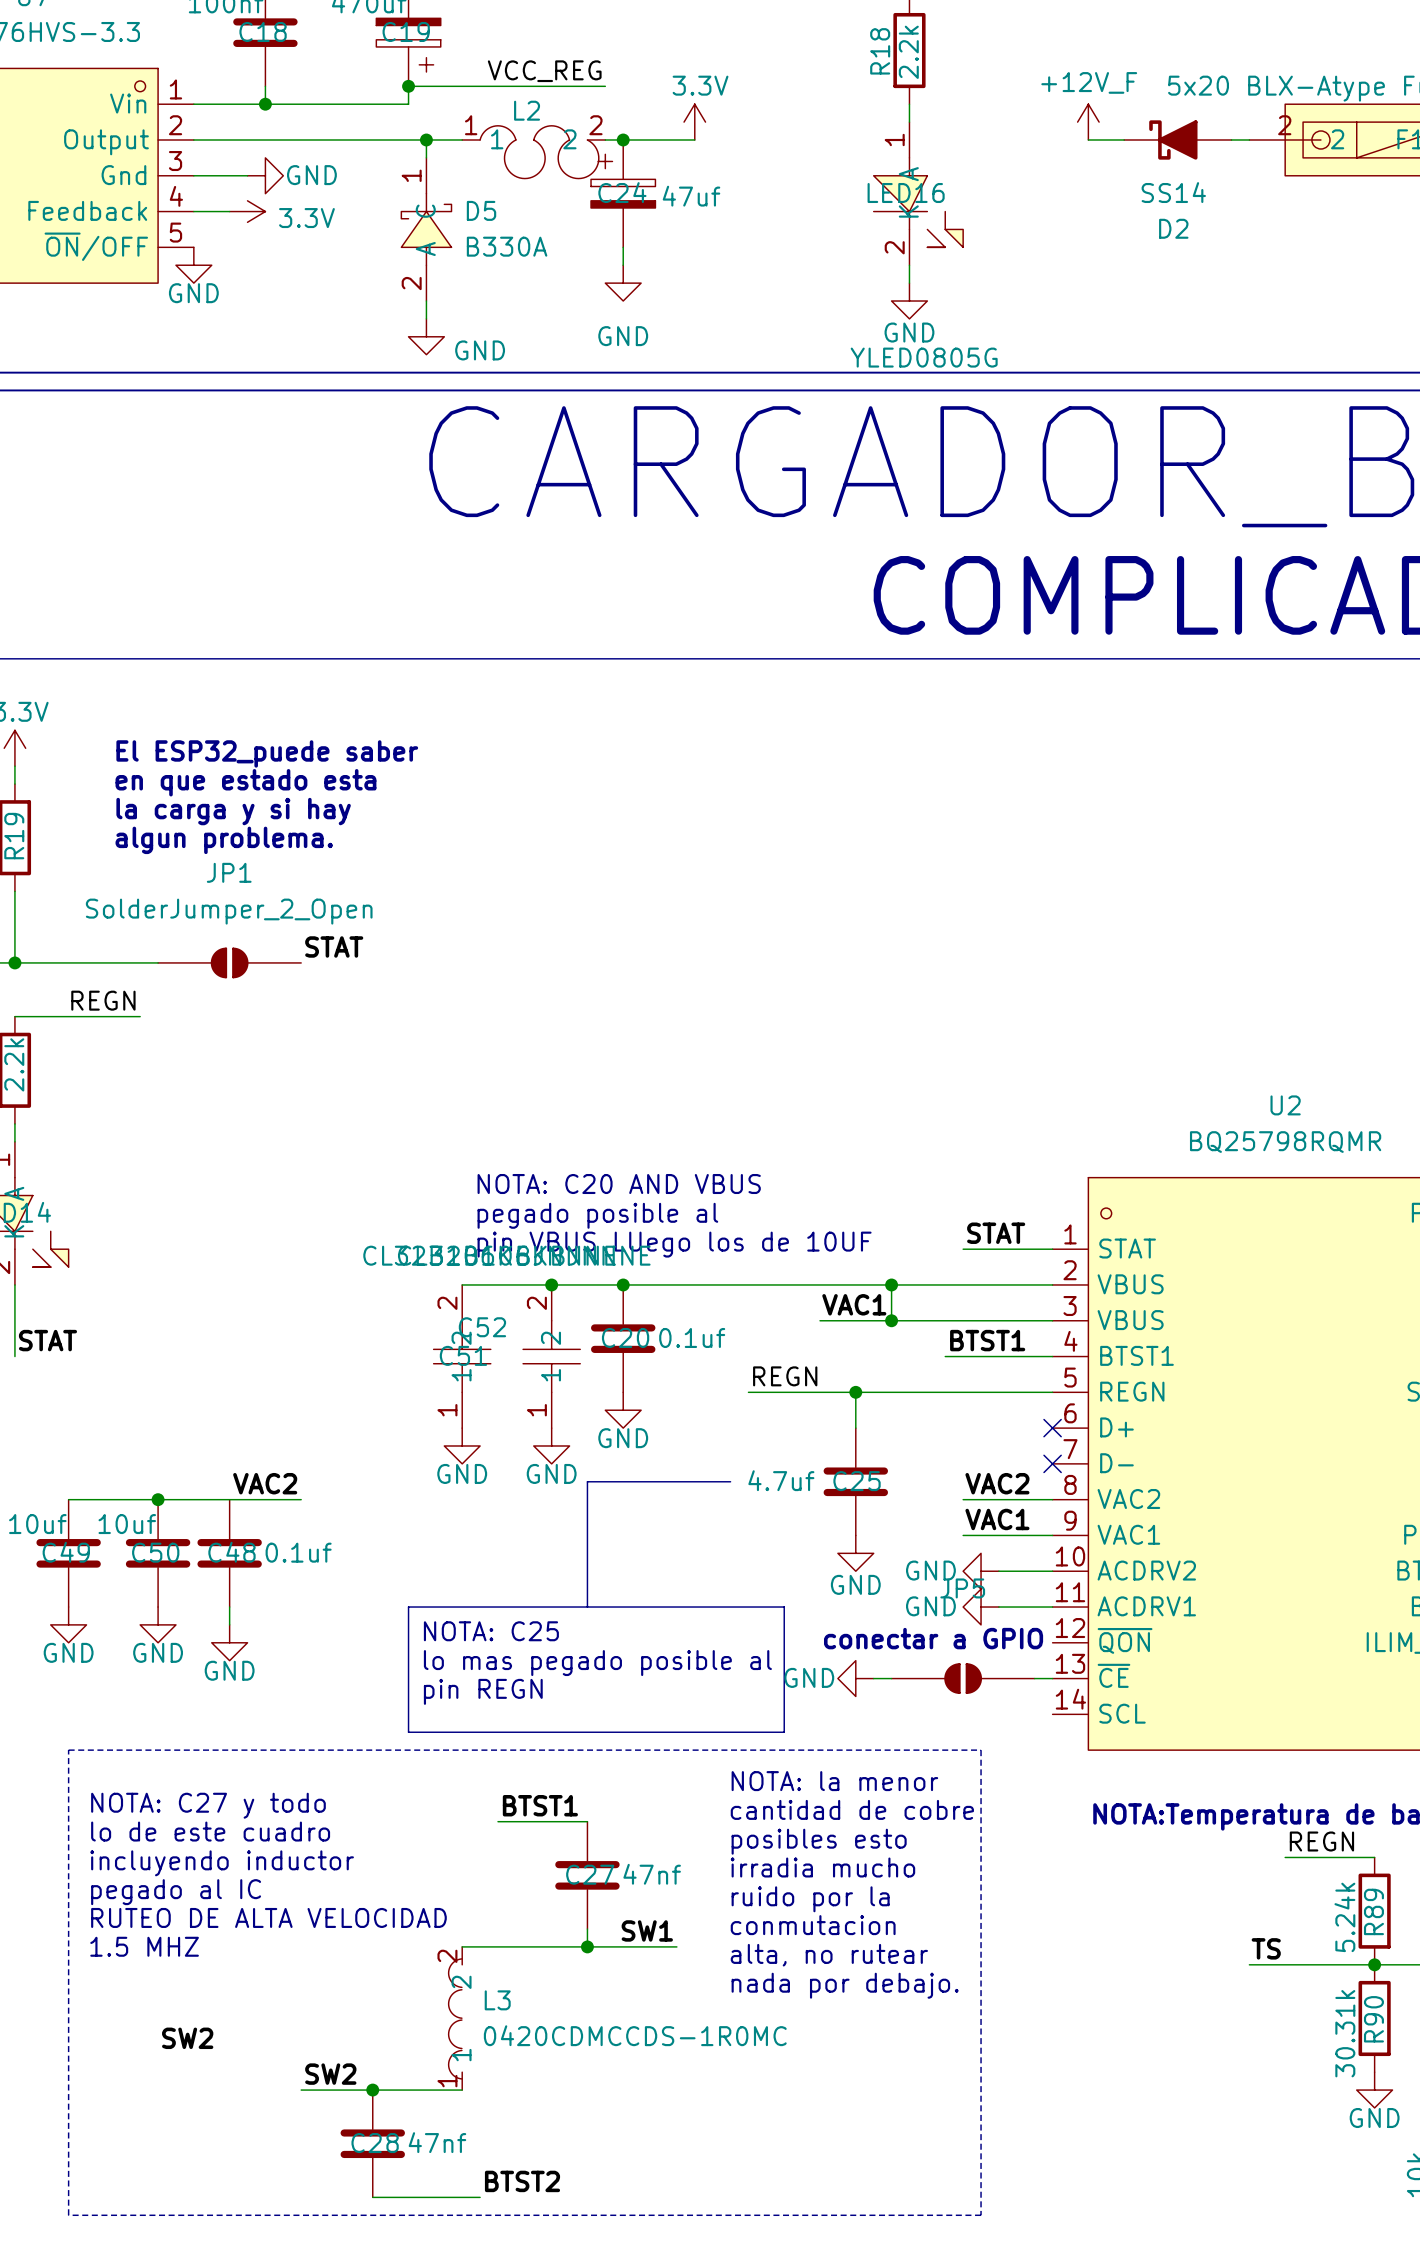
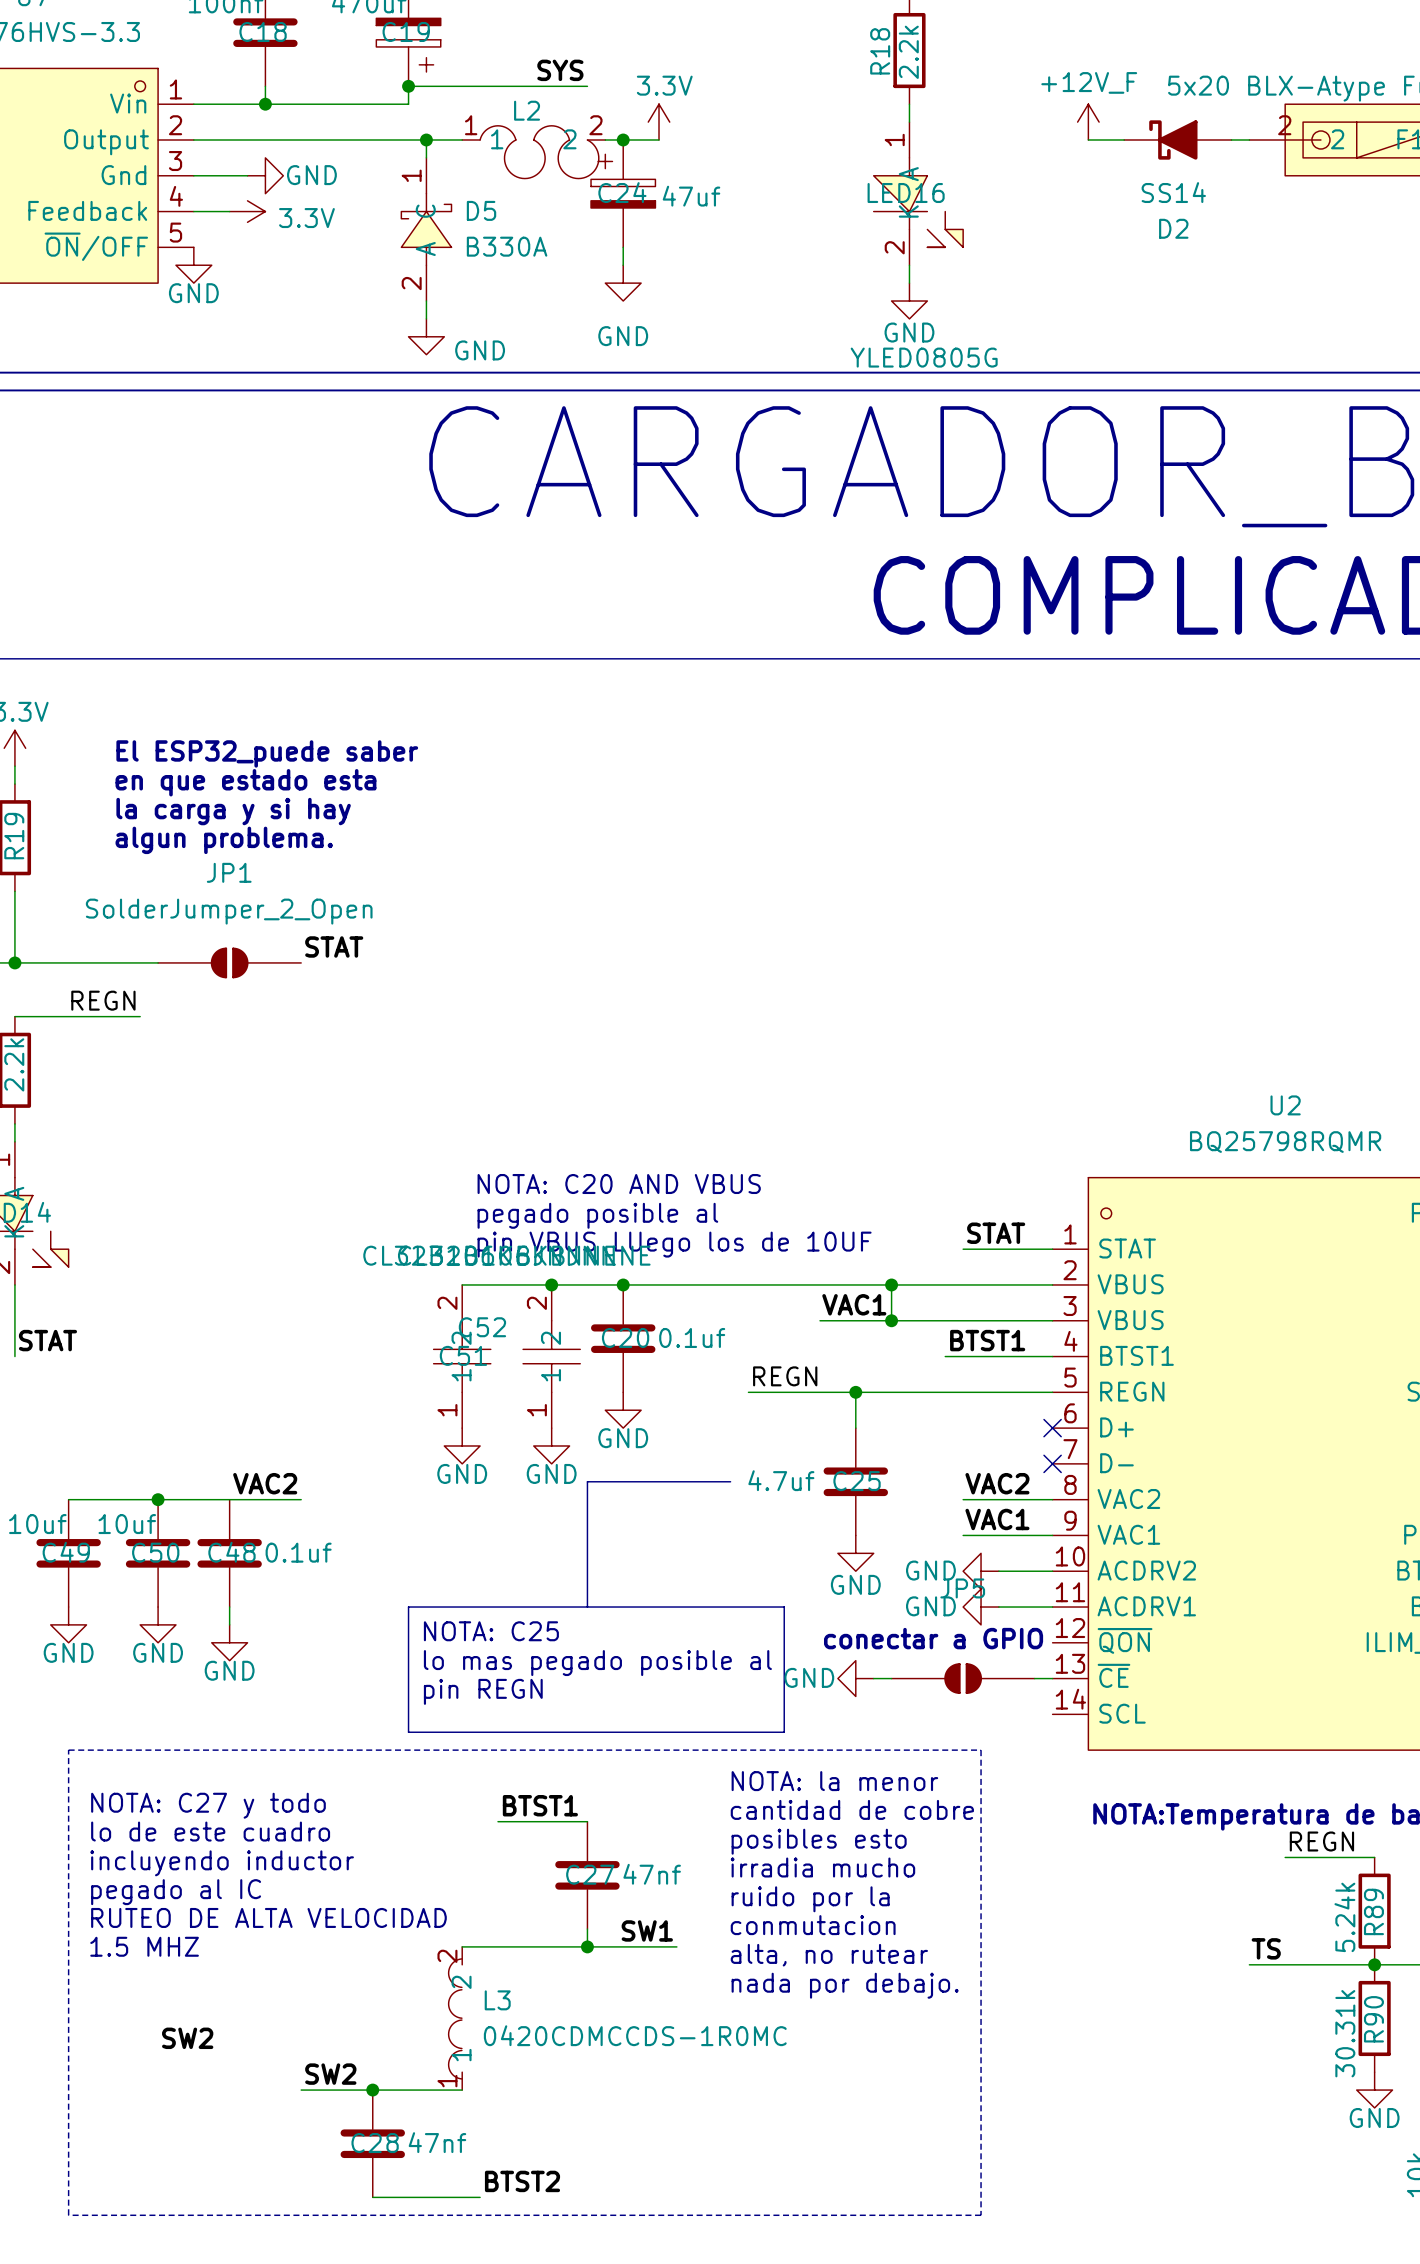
label: none -> SYS (560, 70)
label: VCC_REG (544, 71) -> none
wire: (587, 86) (605, 86) -> none
power symbol position: 3.3V (694, 122) -> 3.3V (659, 122)
wire: (659, 139) (694, 139) -> none

